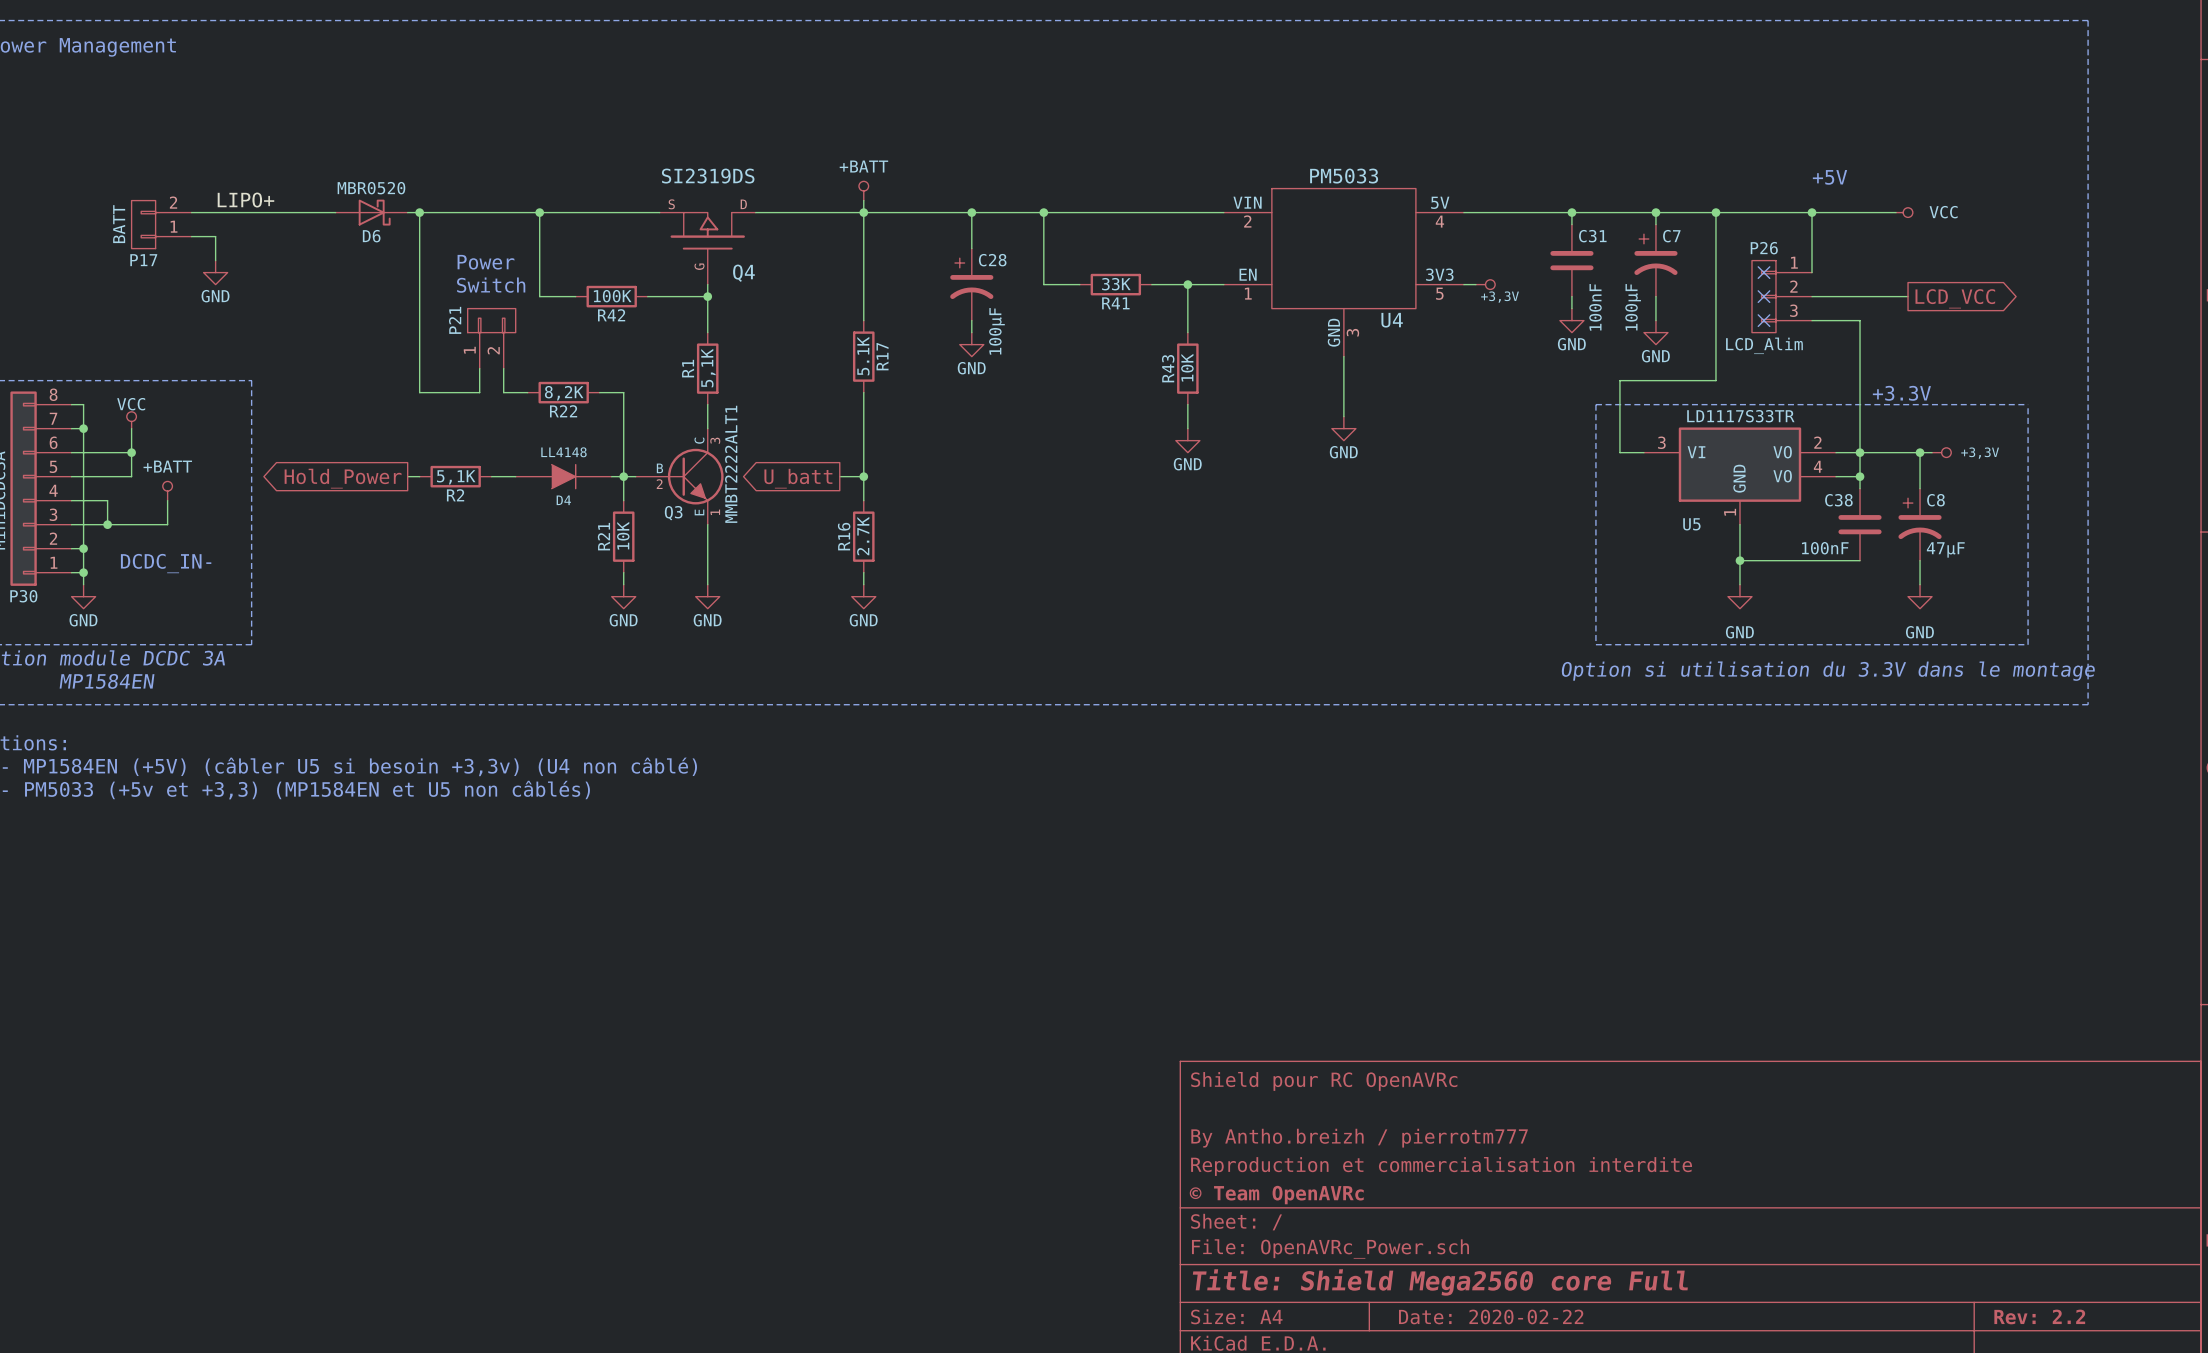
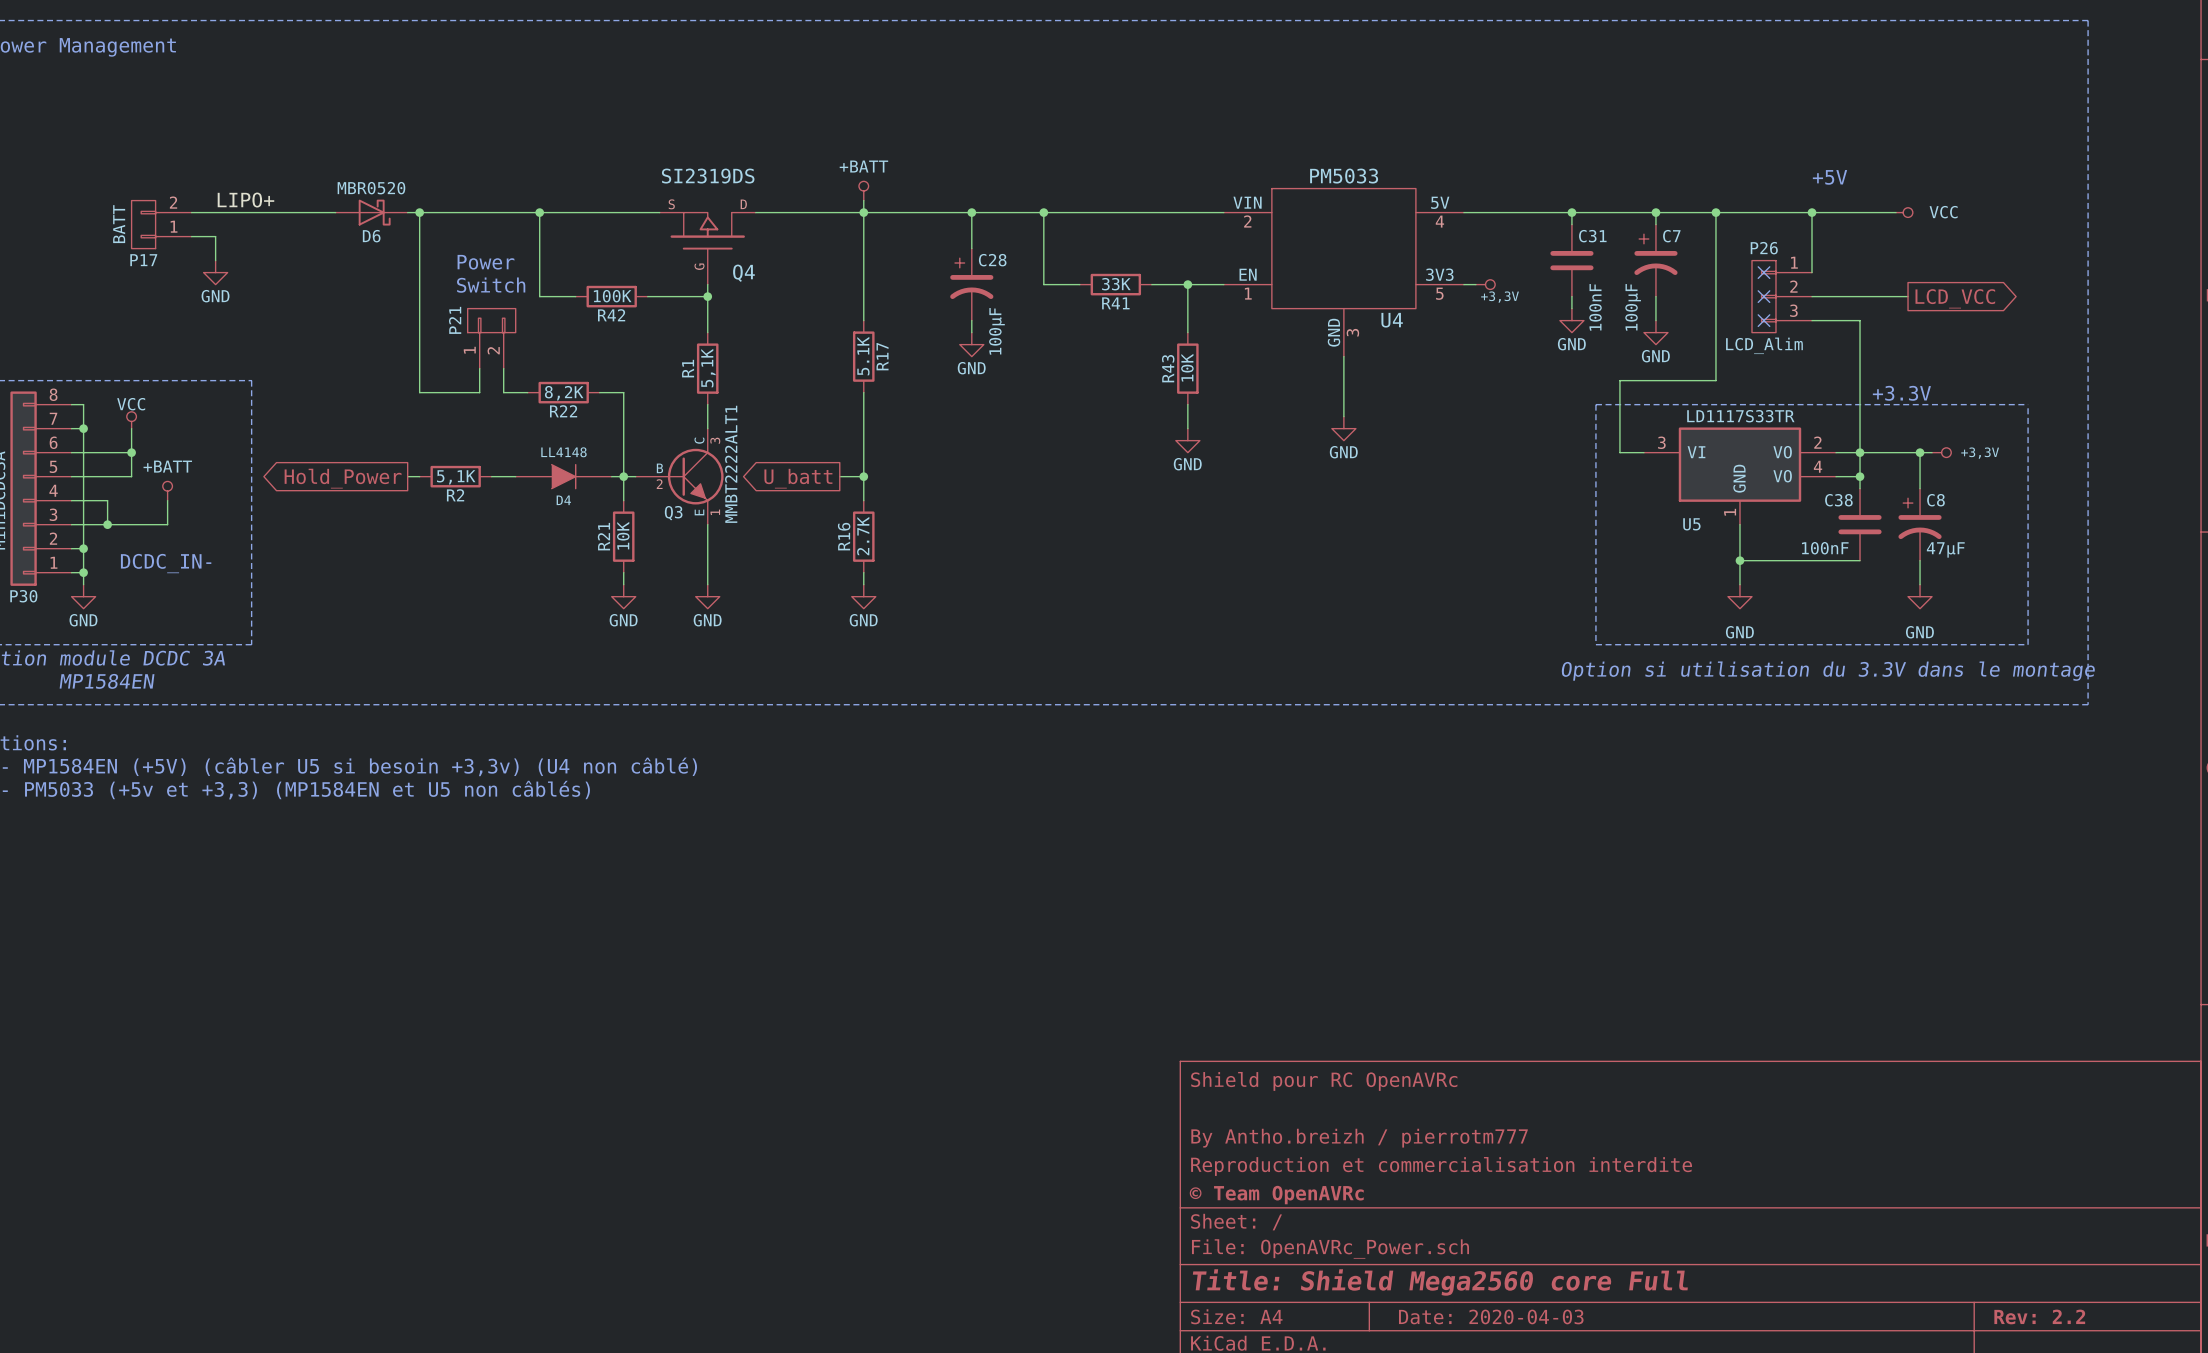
title block: Date: 2020-02-22 (1491, 1316) -> Date: 2020-04-03 (1491, 1316)

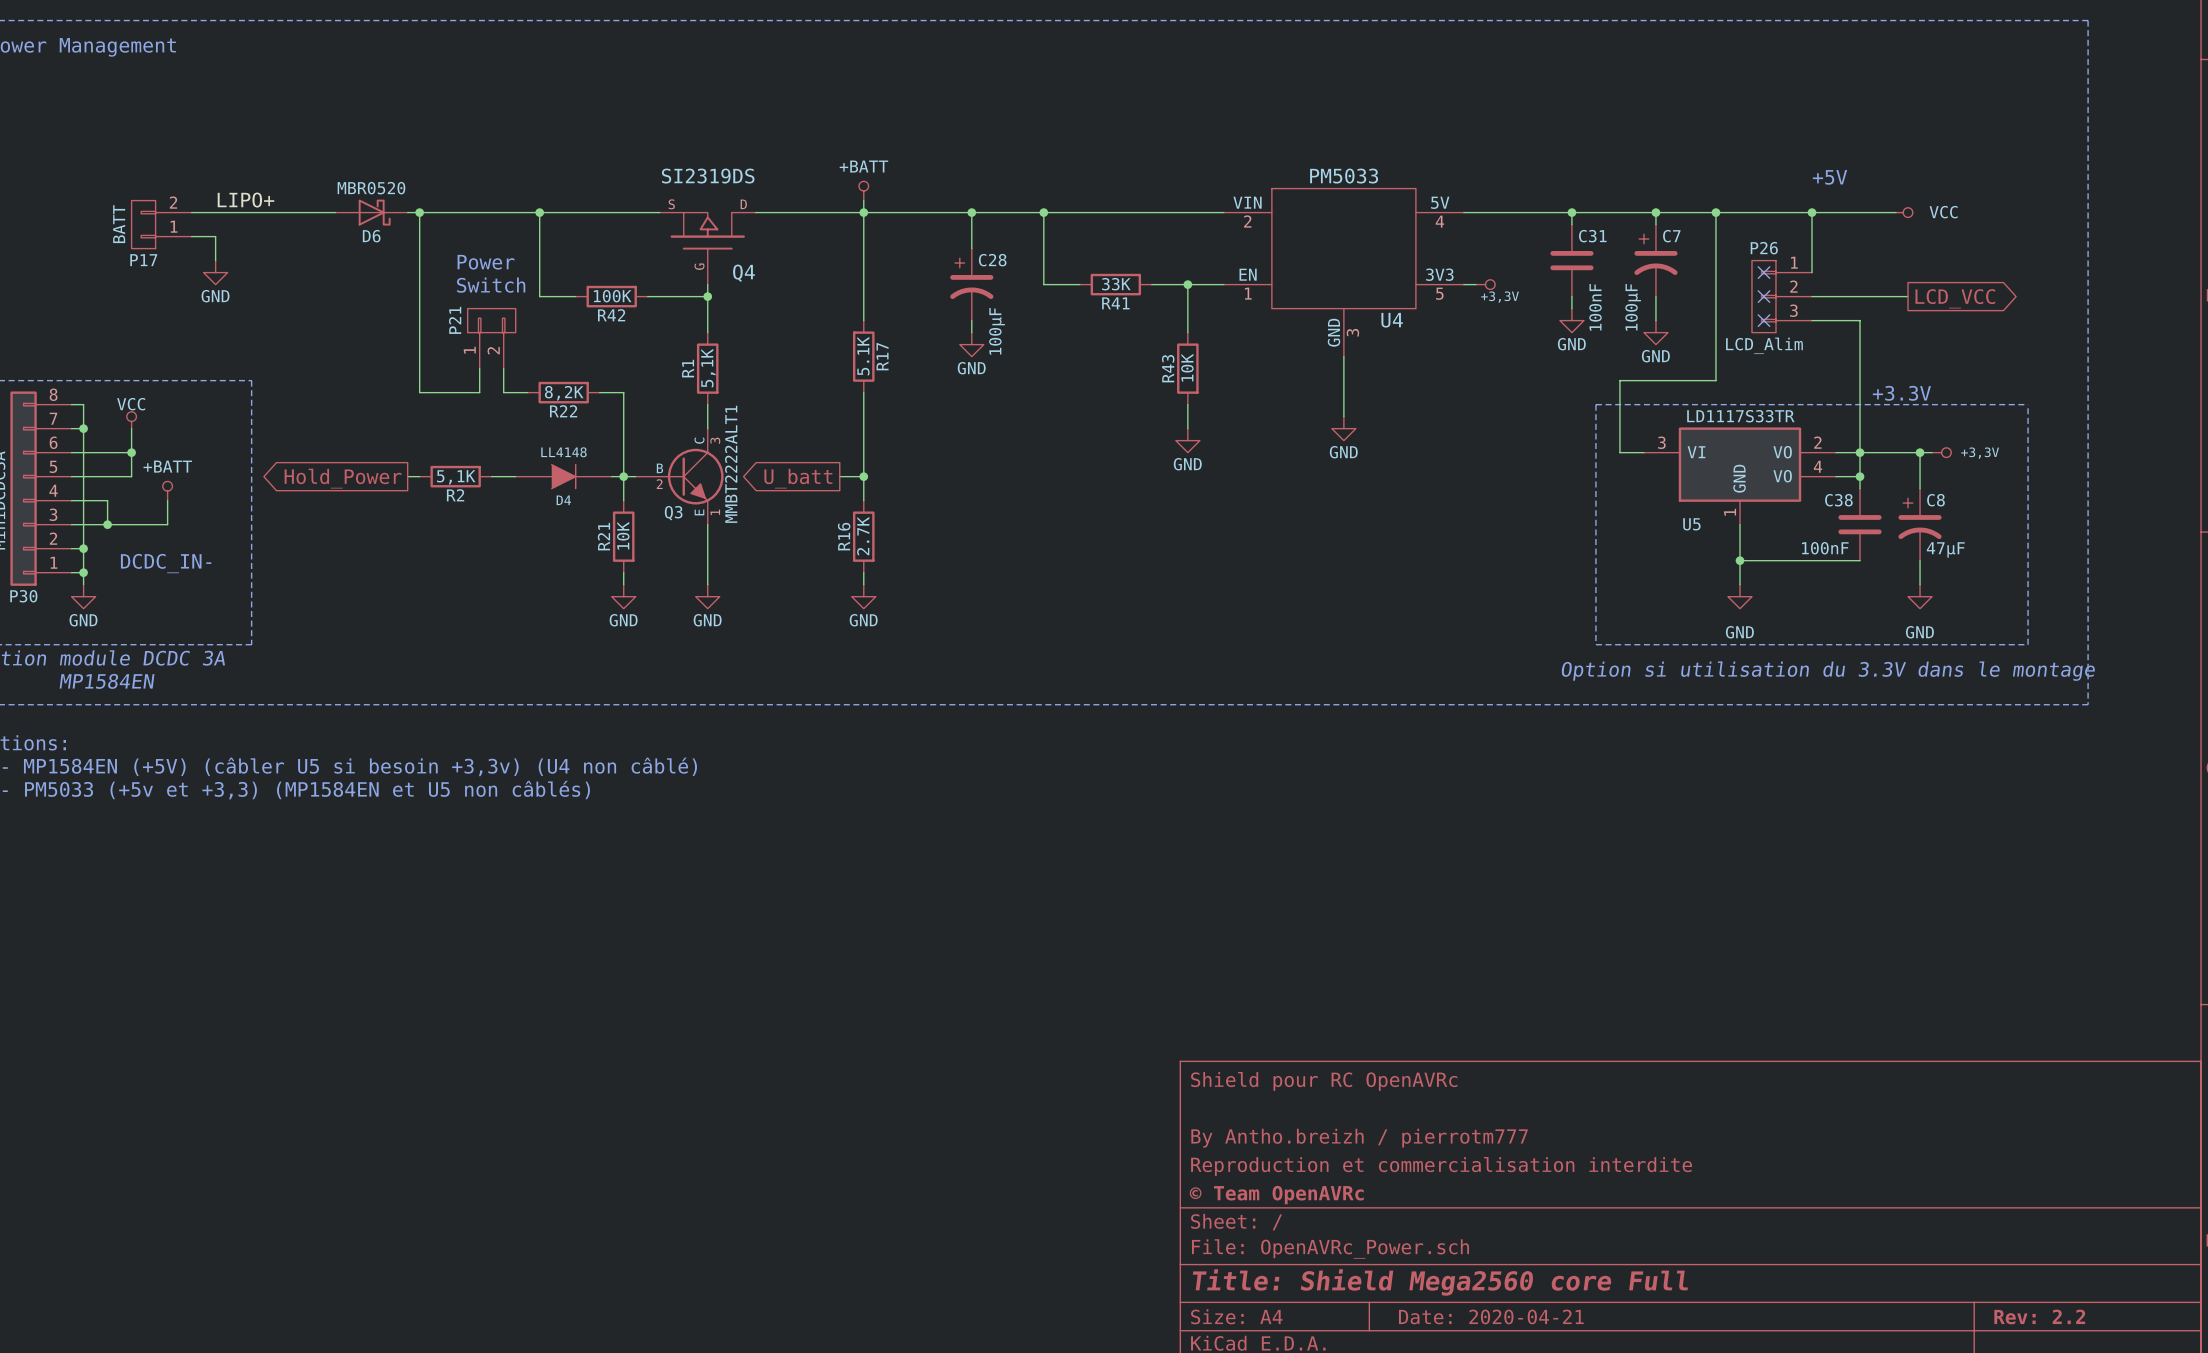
title block: Date: 2020-04-03 (1491, 1316) -> Date: 2020-04-21 (1491, 1316)

